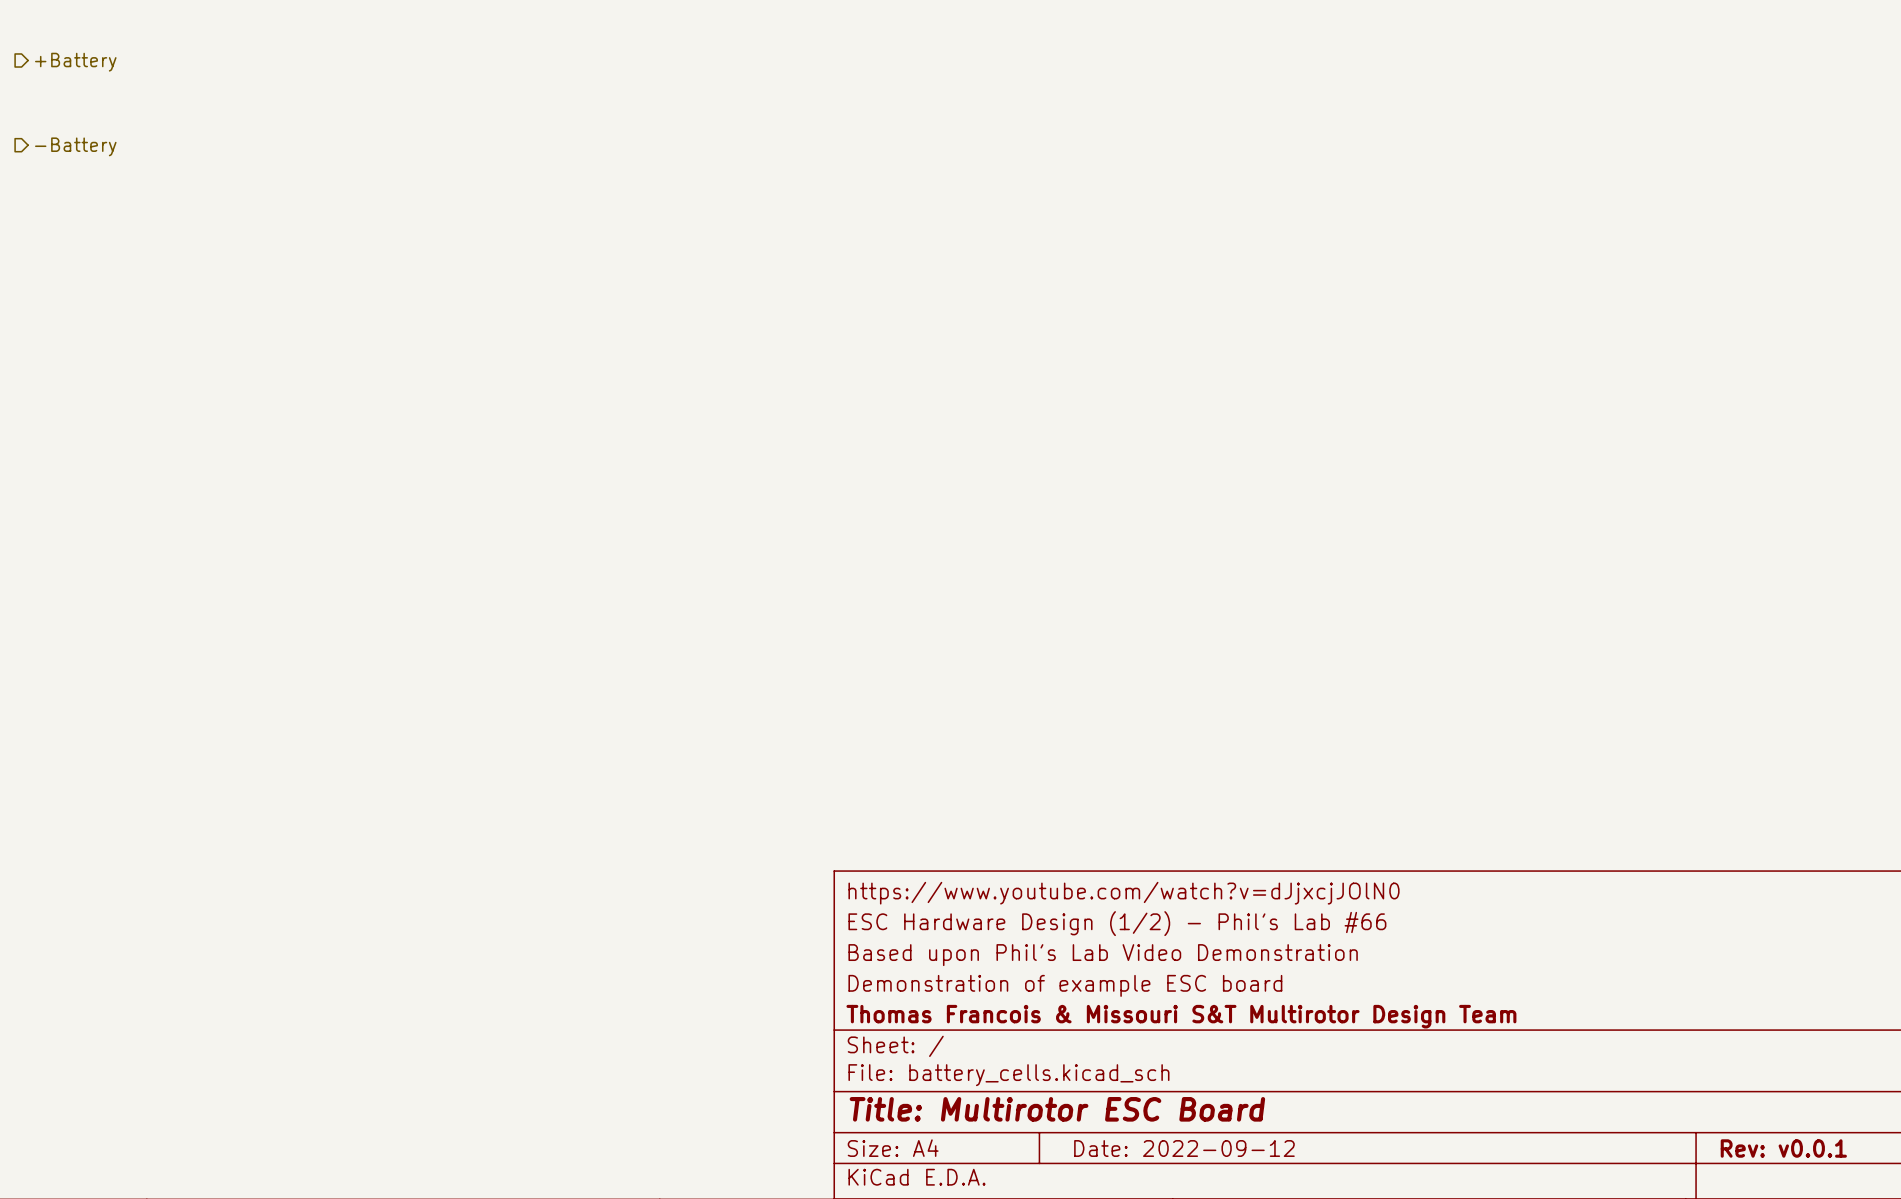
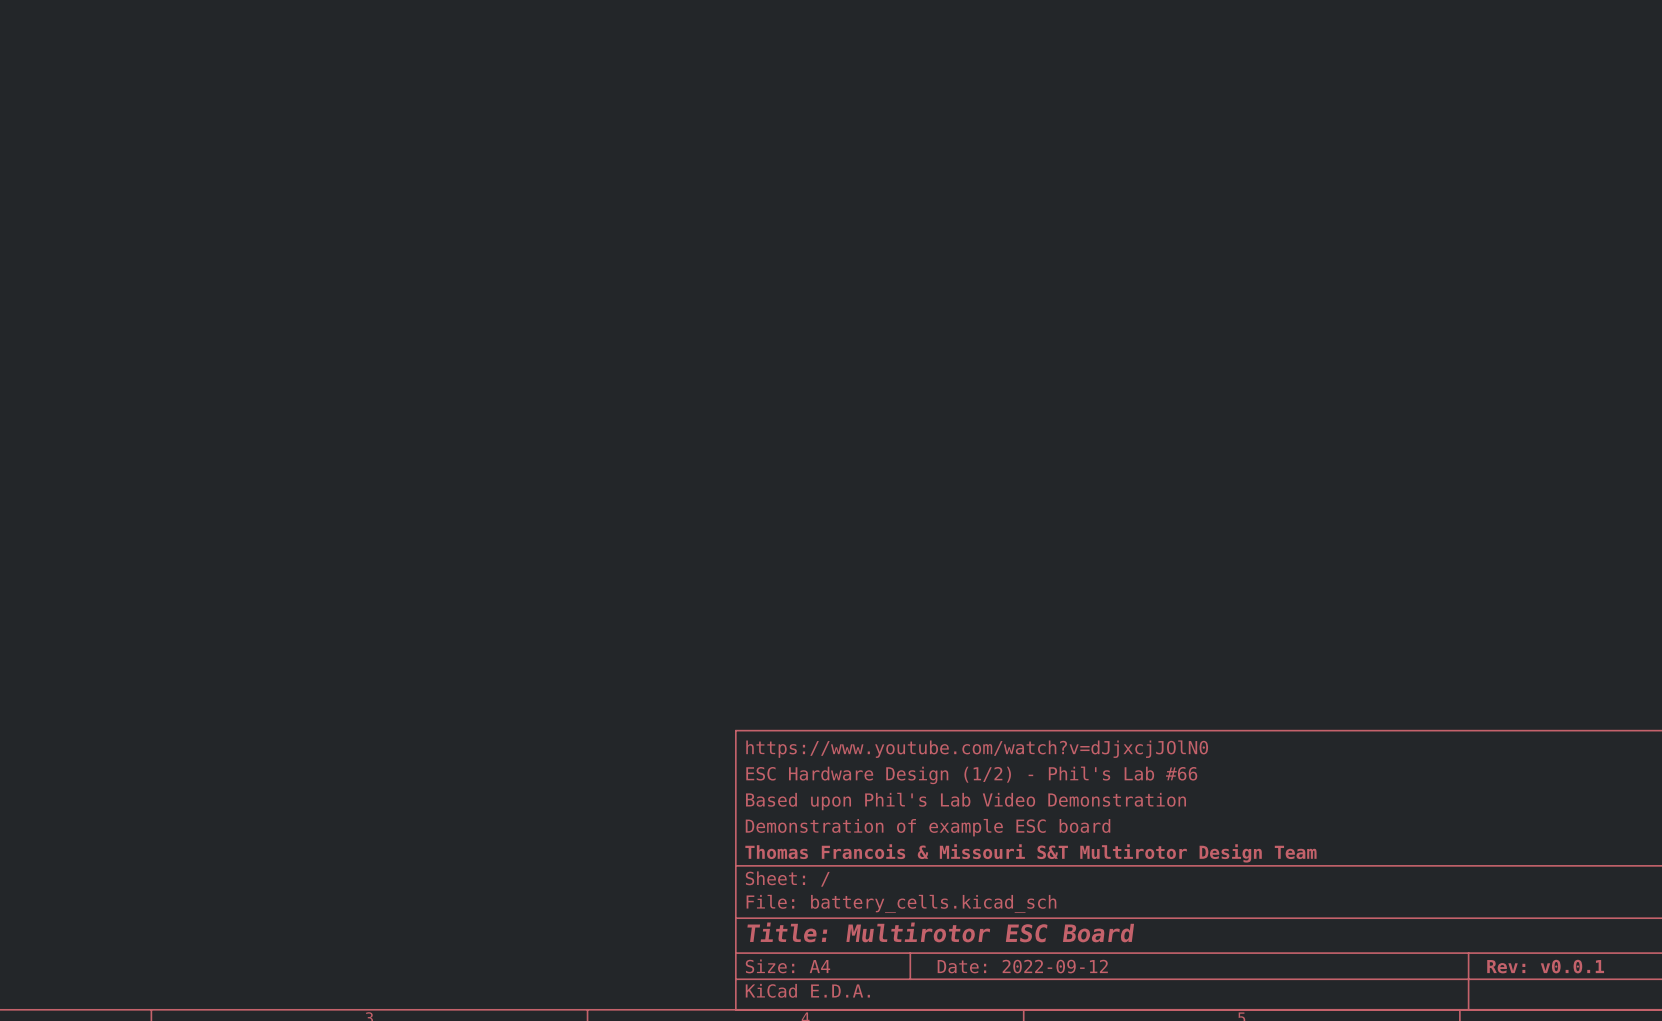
hierarchical label: +Battery (75, 62) -> none
hierarchical label: -Battery (75, 146) -> none

